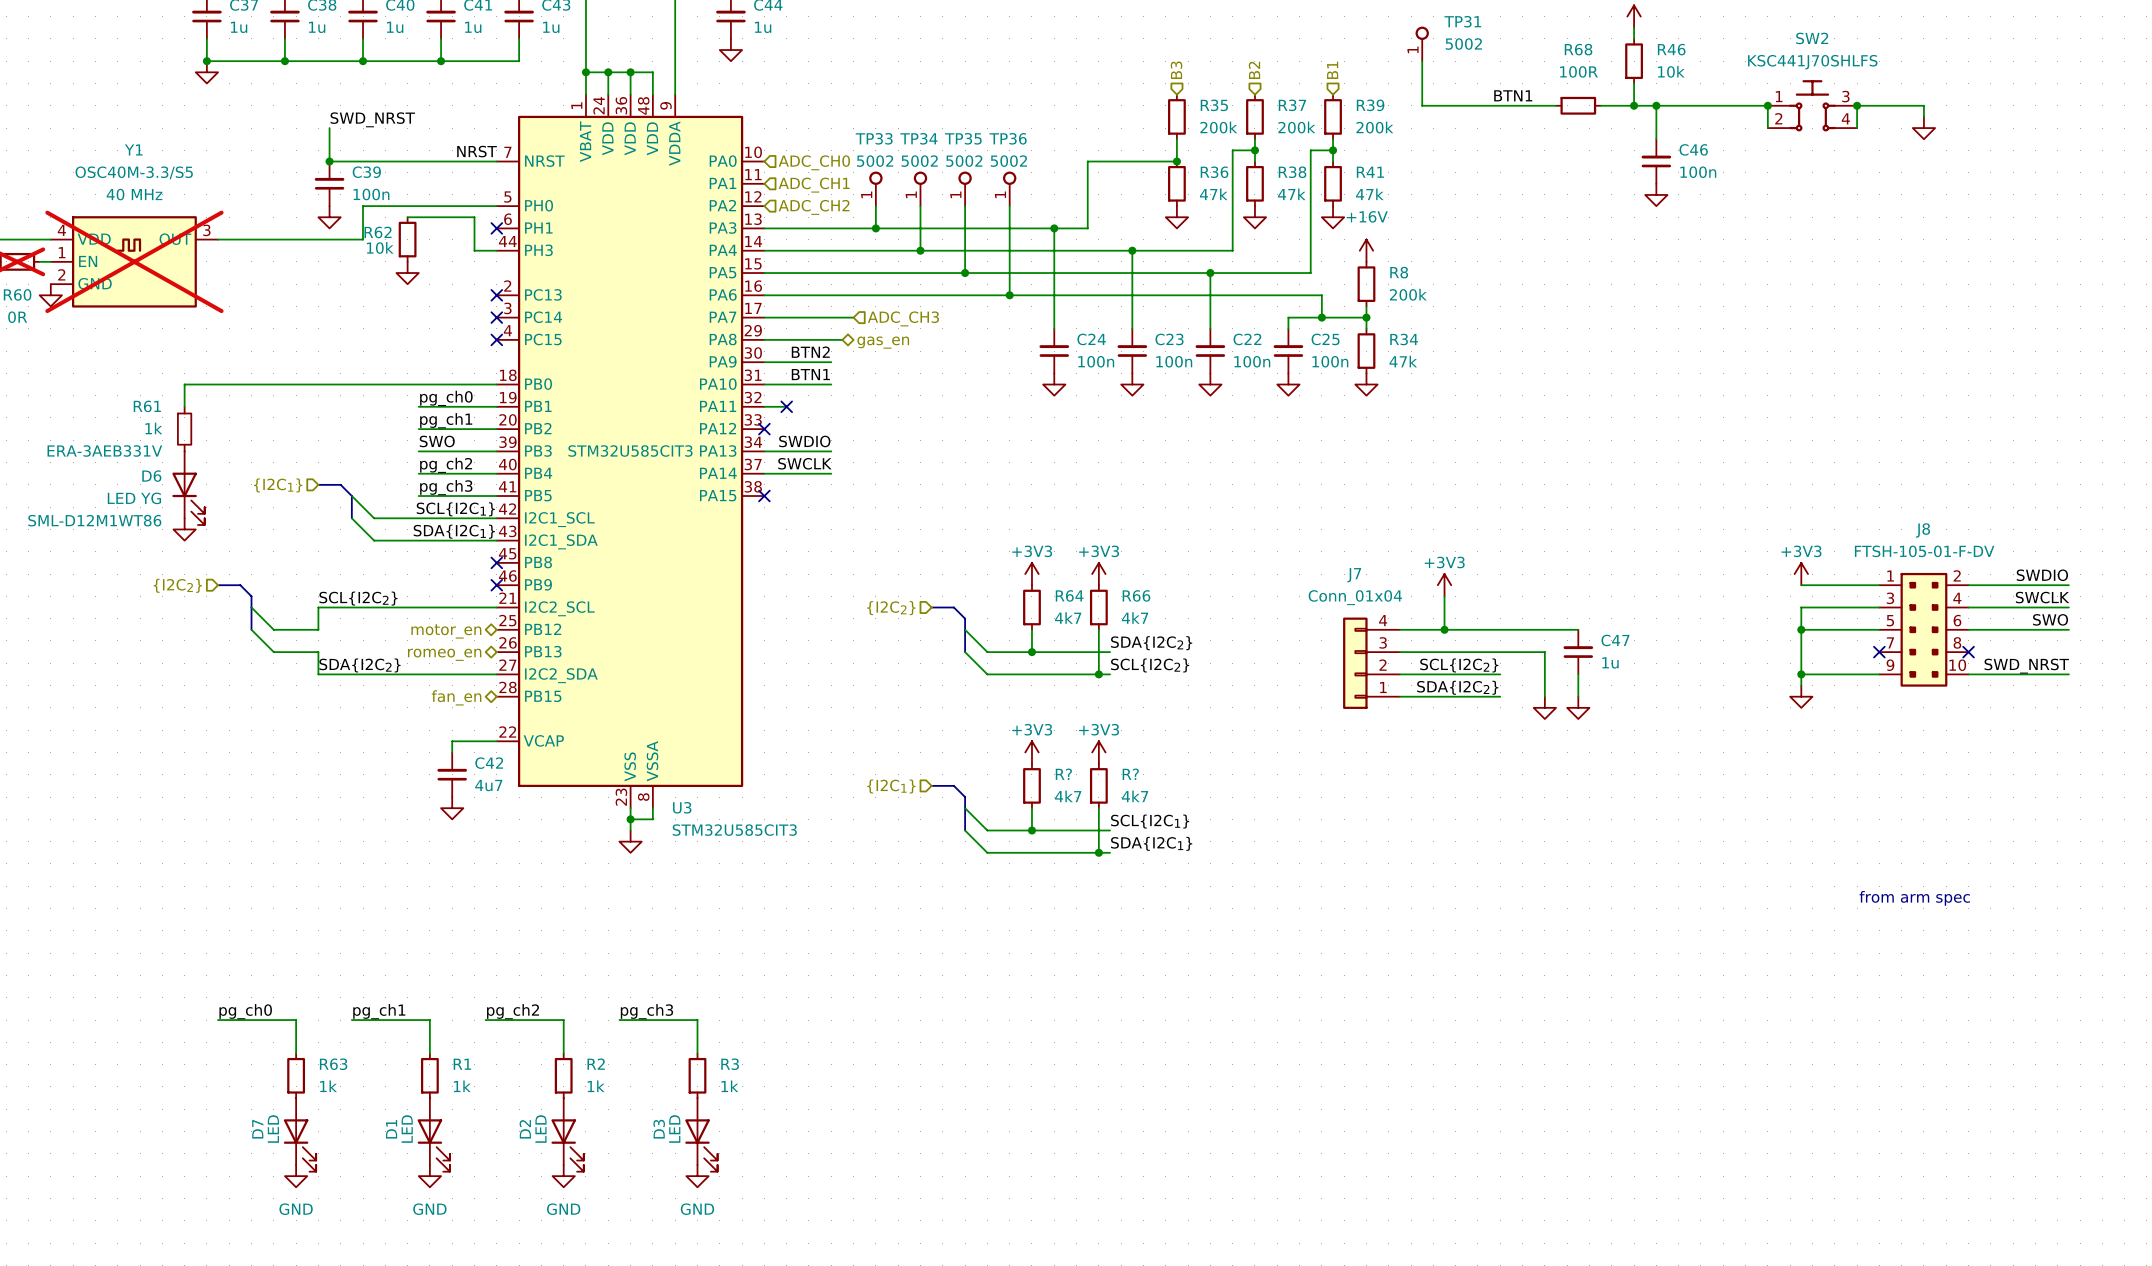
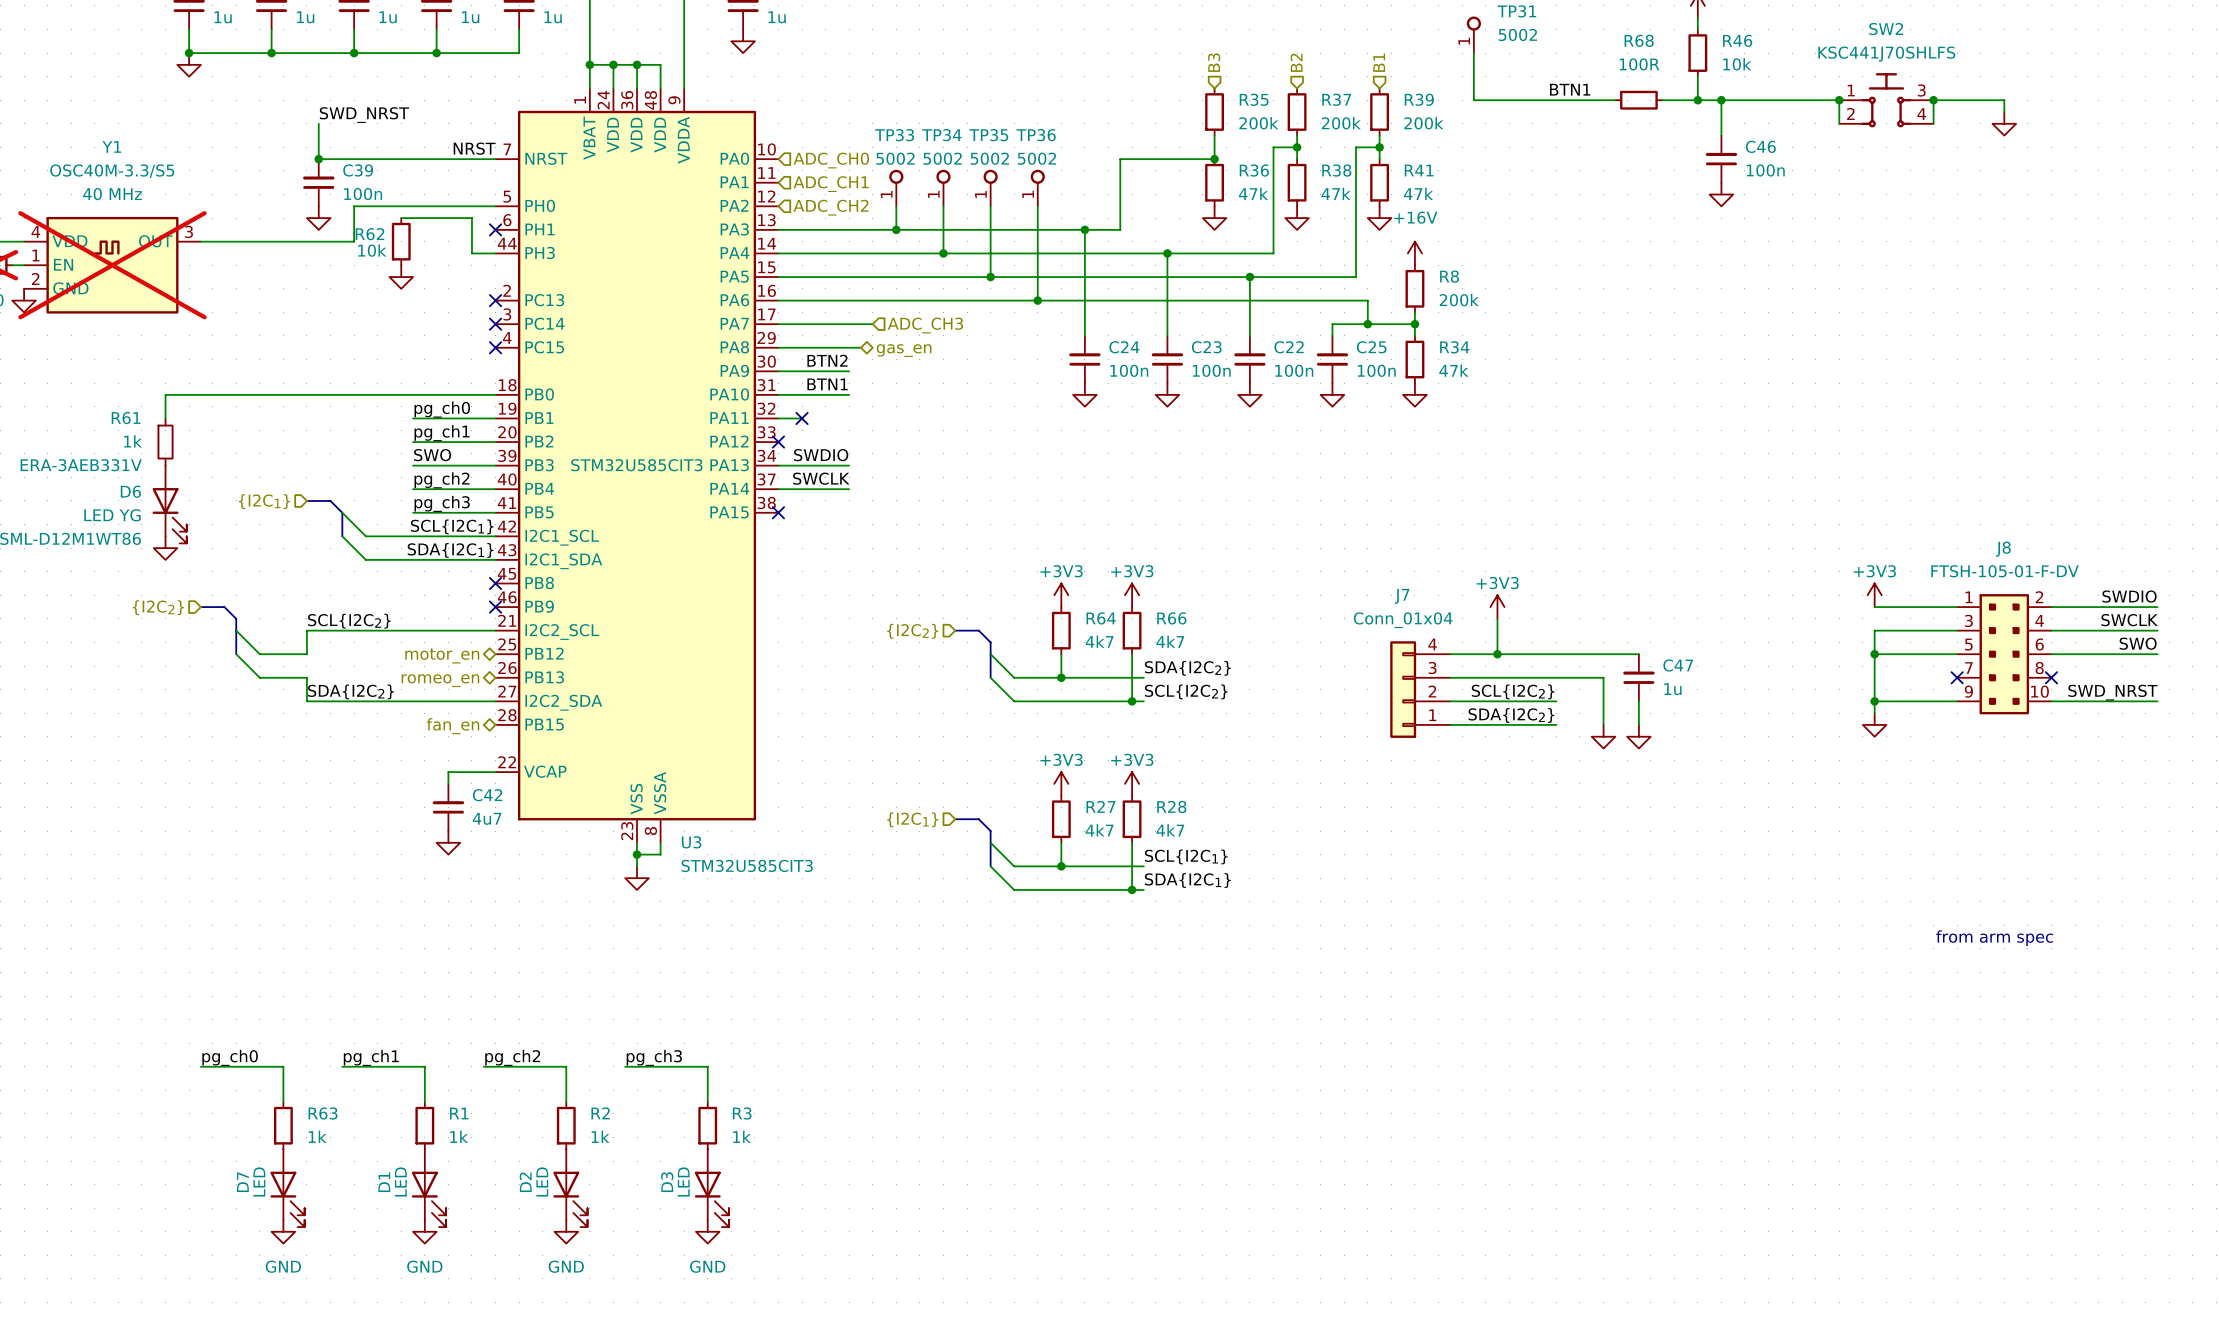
R? name: R? (1063, 774) -> R27 (1100, 806)
R? name: R? (1130, 774) -> R28 (1171, 807)

